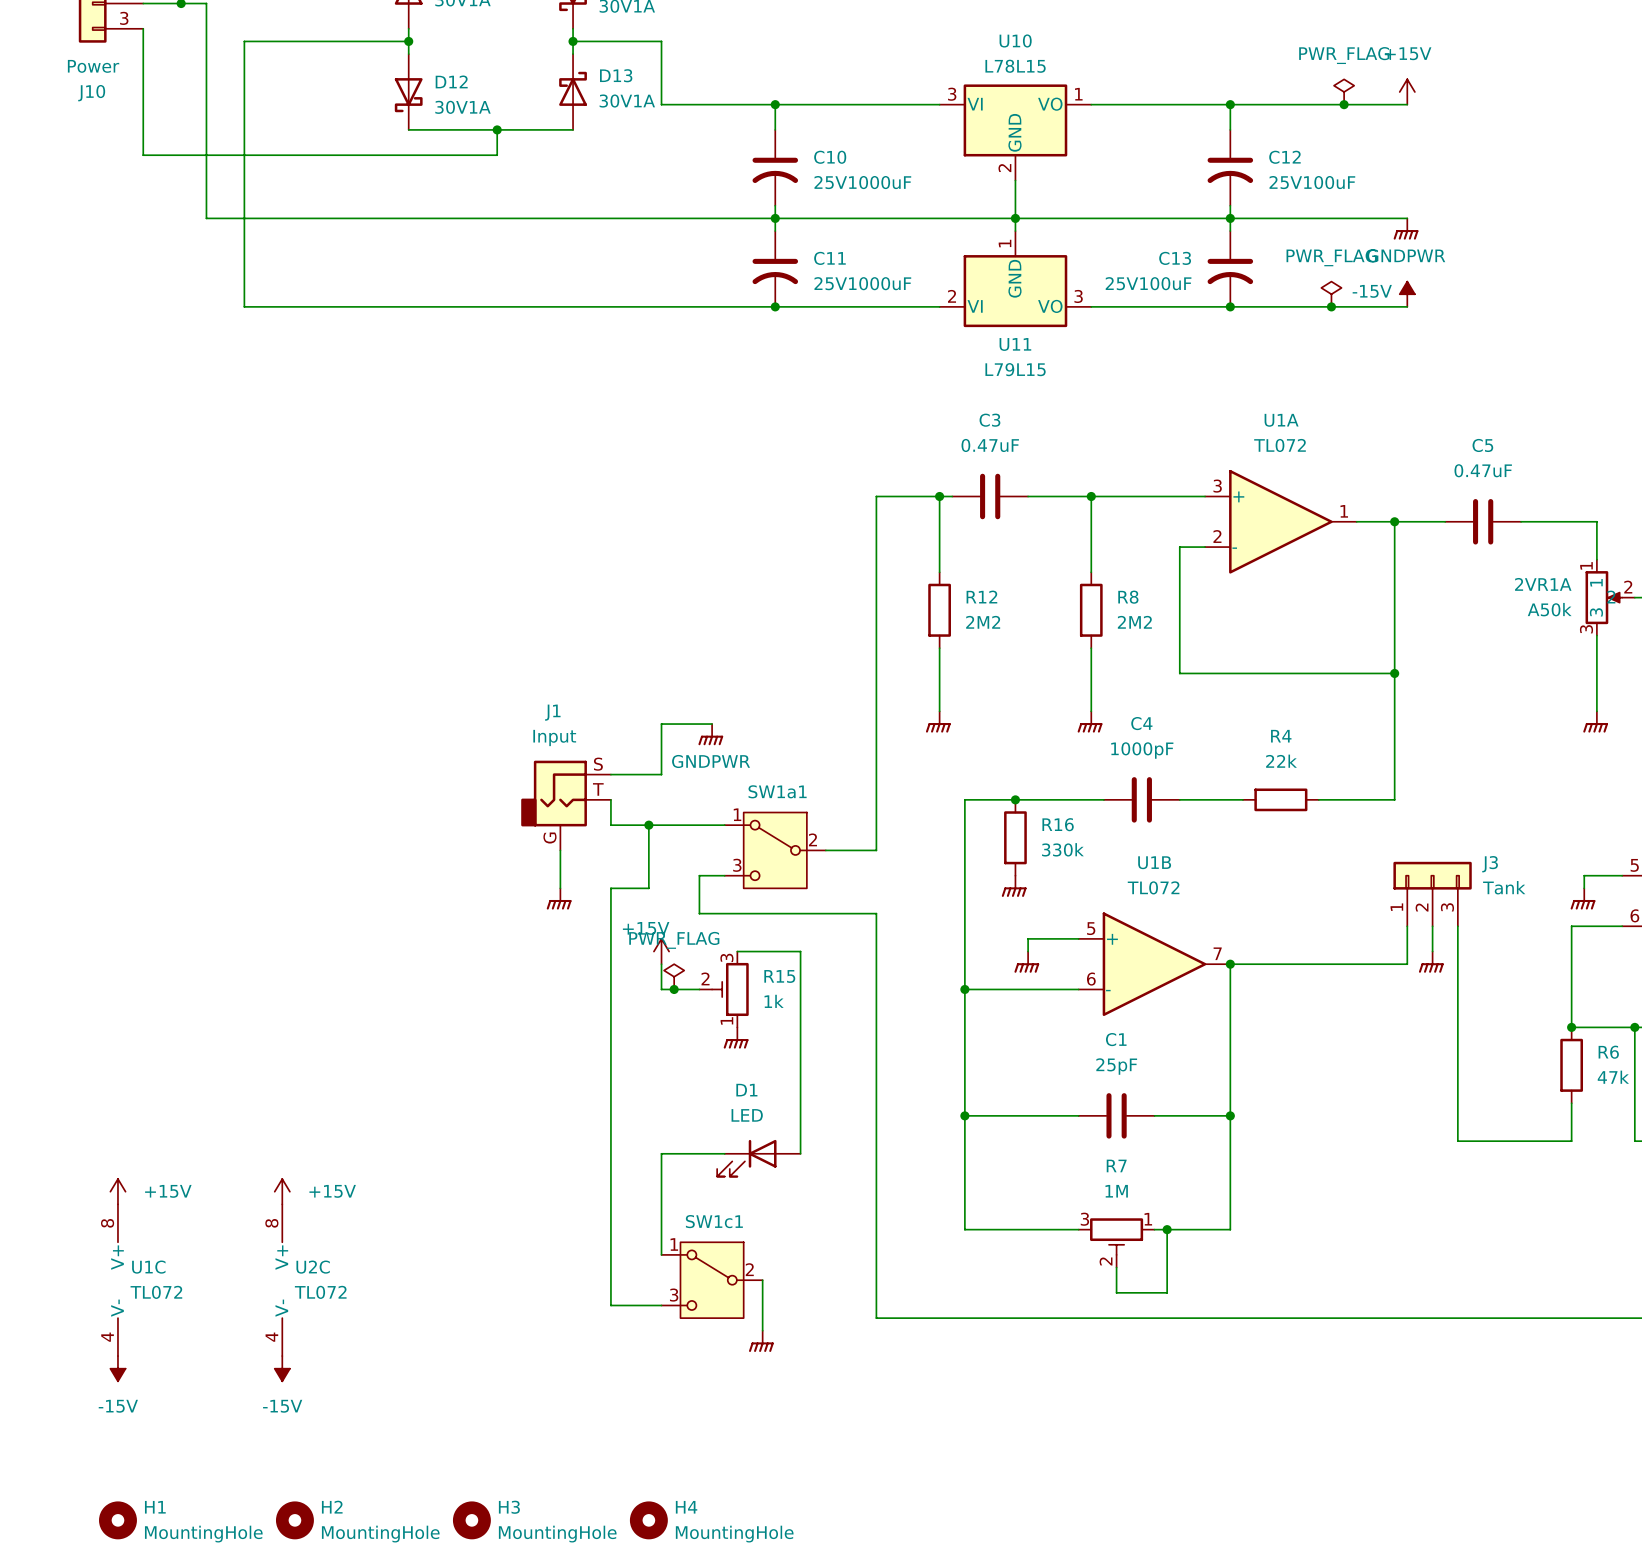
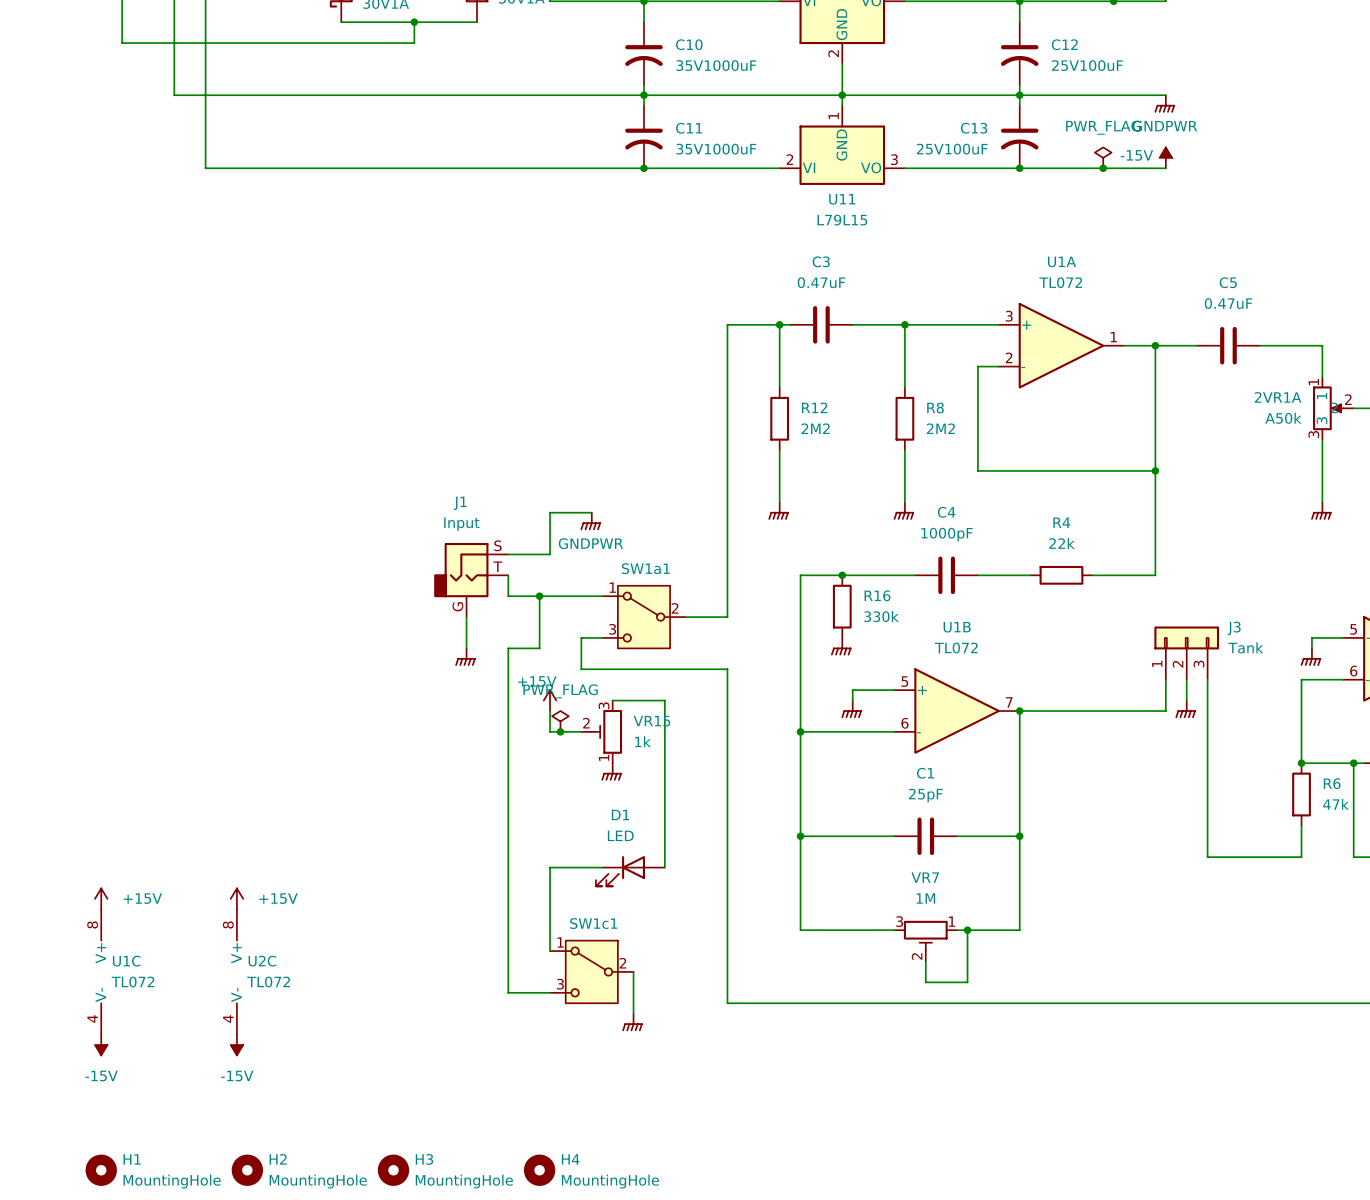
C10 value: 25V1000uF (862, 182) -> 35V1000uF (716, 65)
C11 value: 25V1000uF (862, 283) -> 35V1000uF (716, 149)
R15 name: R15 (779, 976) -> VR15 (651, 721)
R7 name: R7 (1116, 1165) -> VR7 (925, 877)

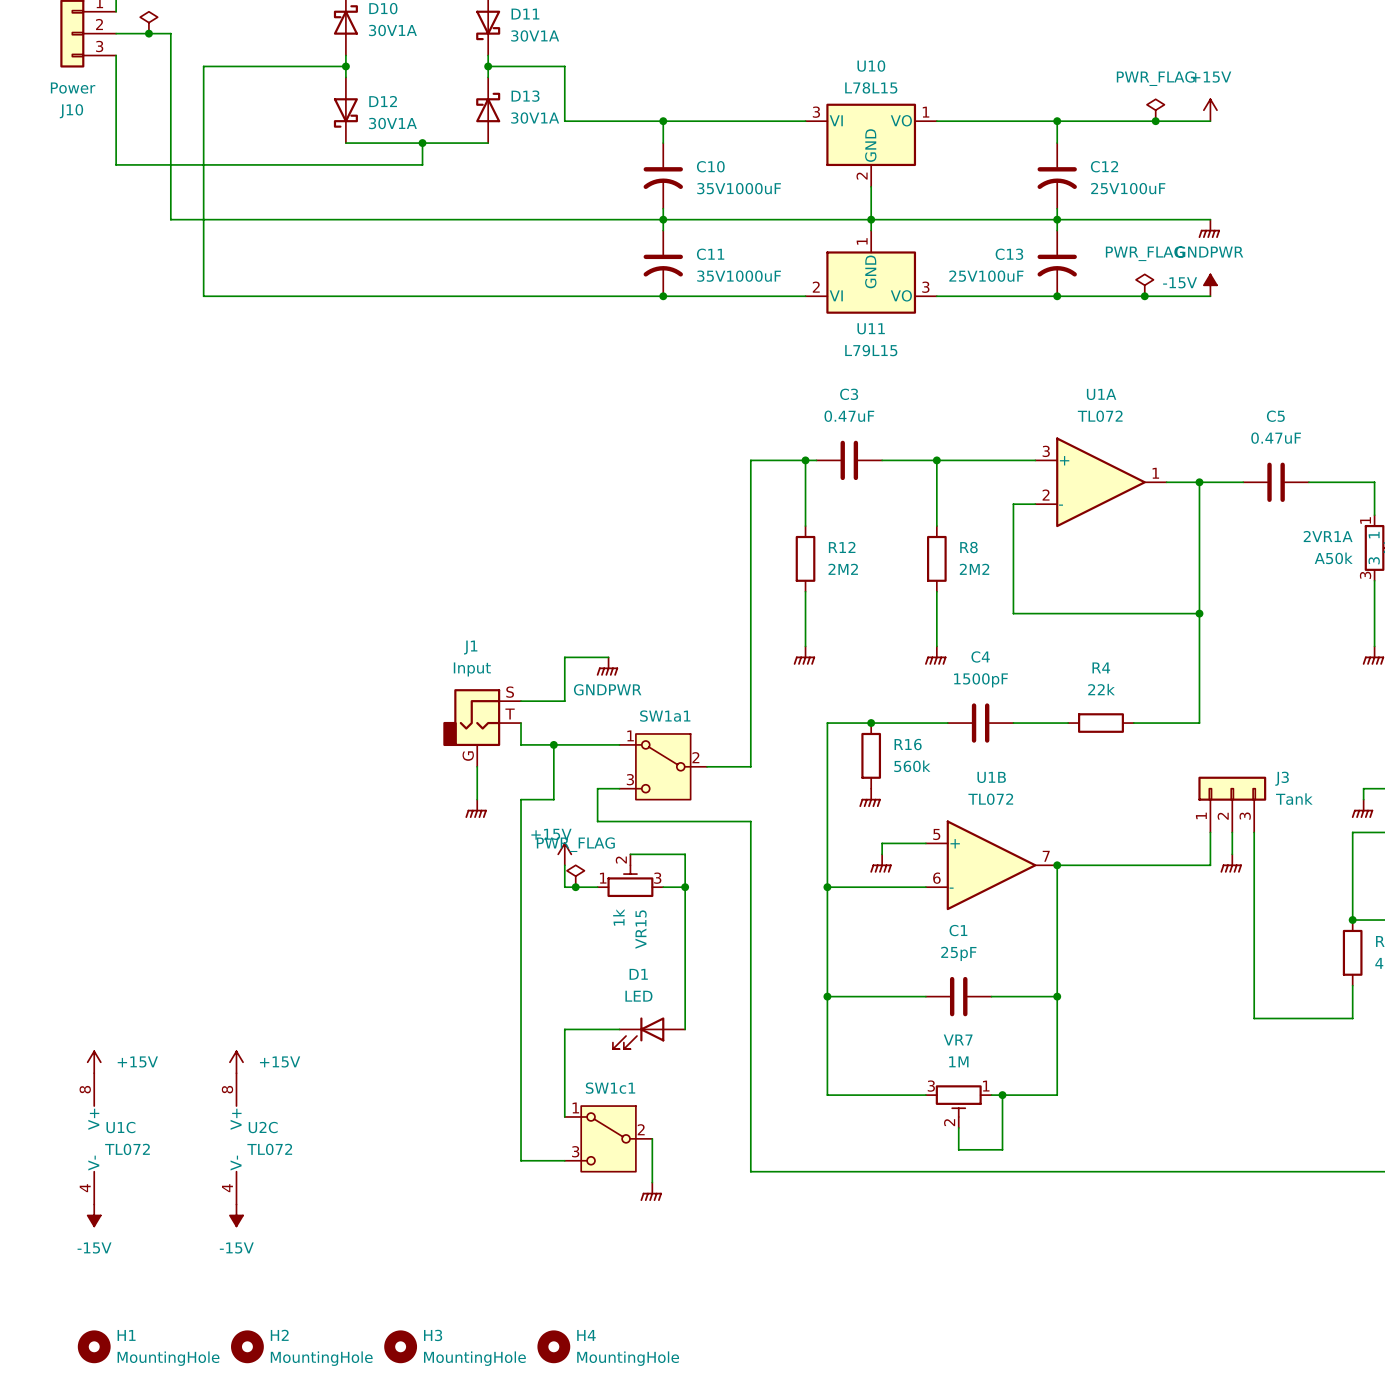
C4 value: 1000pF (947, 534) -> 1500pF (981, 680)
R16 value: 330k (881, 616) -> 560k (912, 766)
VR15 rotation: 0° (606, 731) -> 90° clockwise (630, 881)
wire: none -> (663, 887) (685, 887)
junction: none -> (685, 887)
power symbol: (611, 771) -> none

